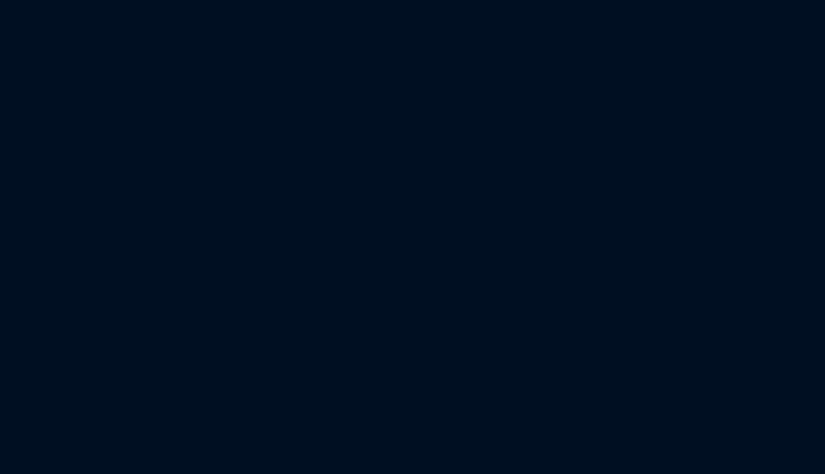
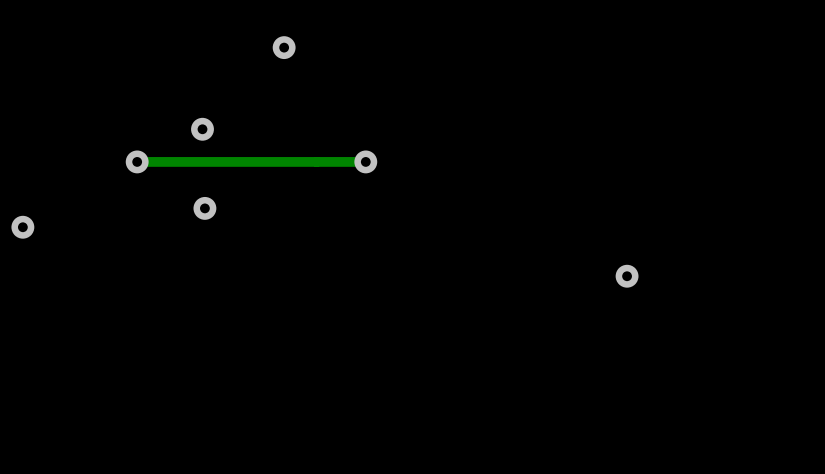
via: none -> (284, 47)
via: none -> (202, 129)
via: none -> (137, 161)
track: none -> (365, 161) (137, 161)
via: none -> (365, 161)
via: none -> (204, 208)
via: none -> (22, 227)
via: none -> (627, 276)

